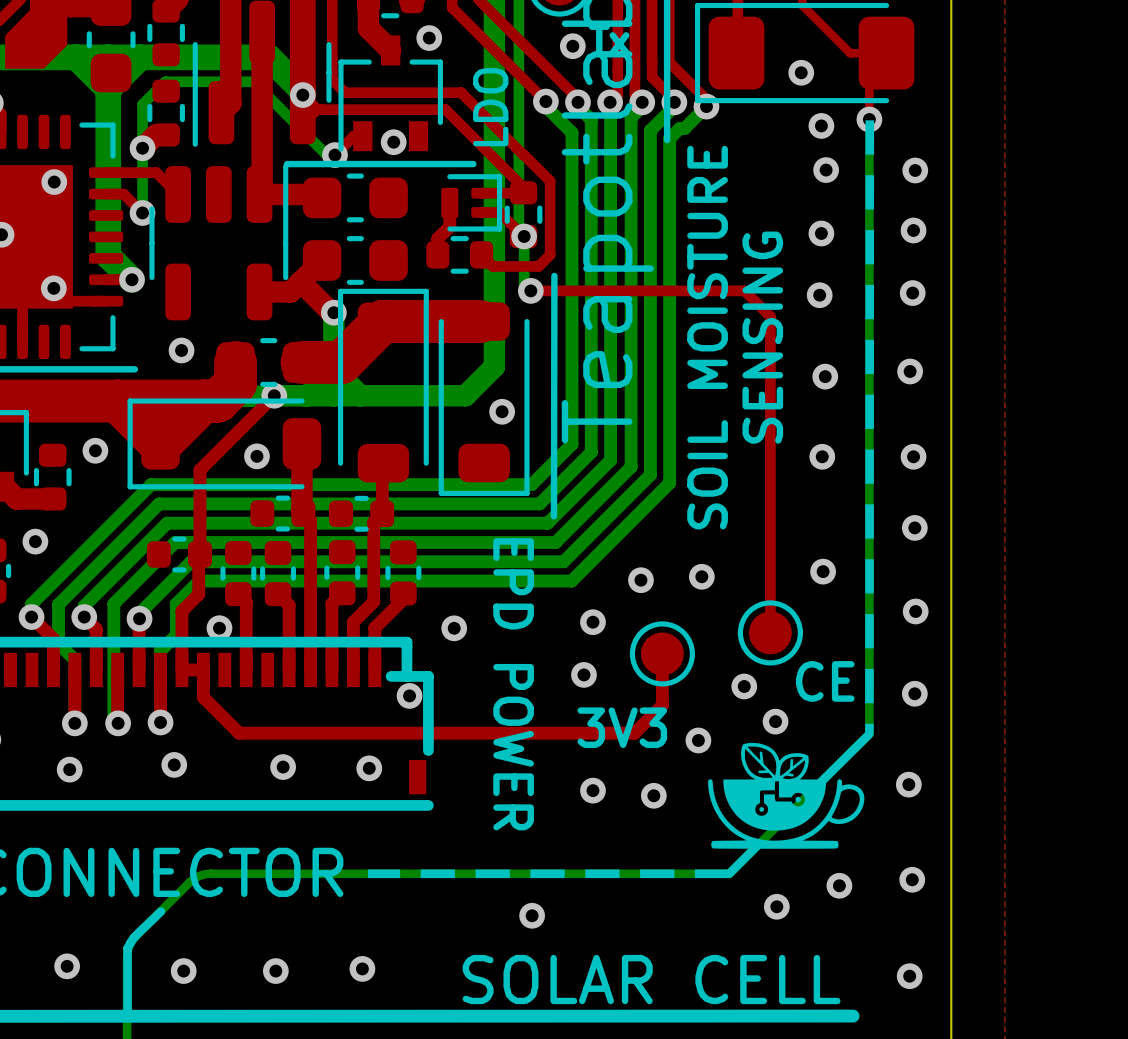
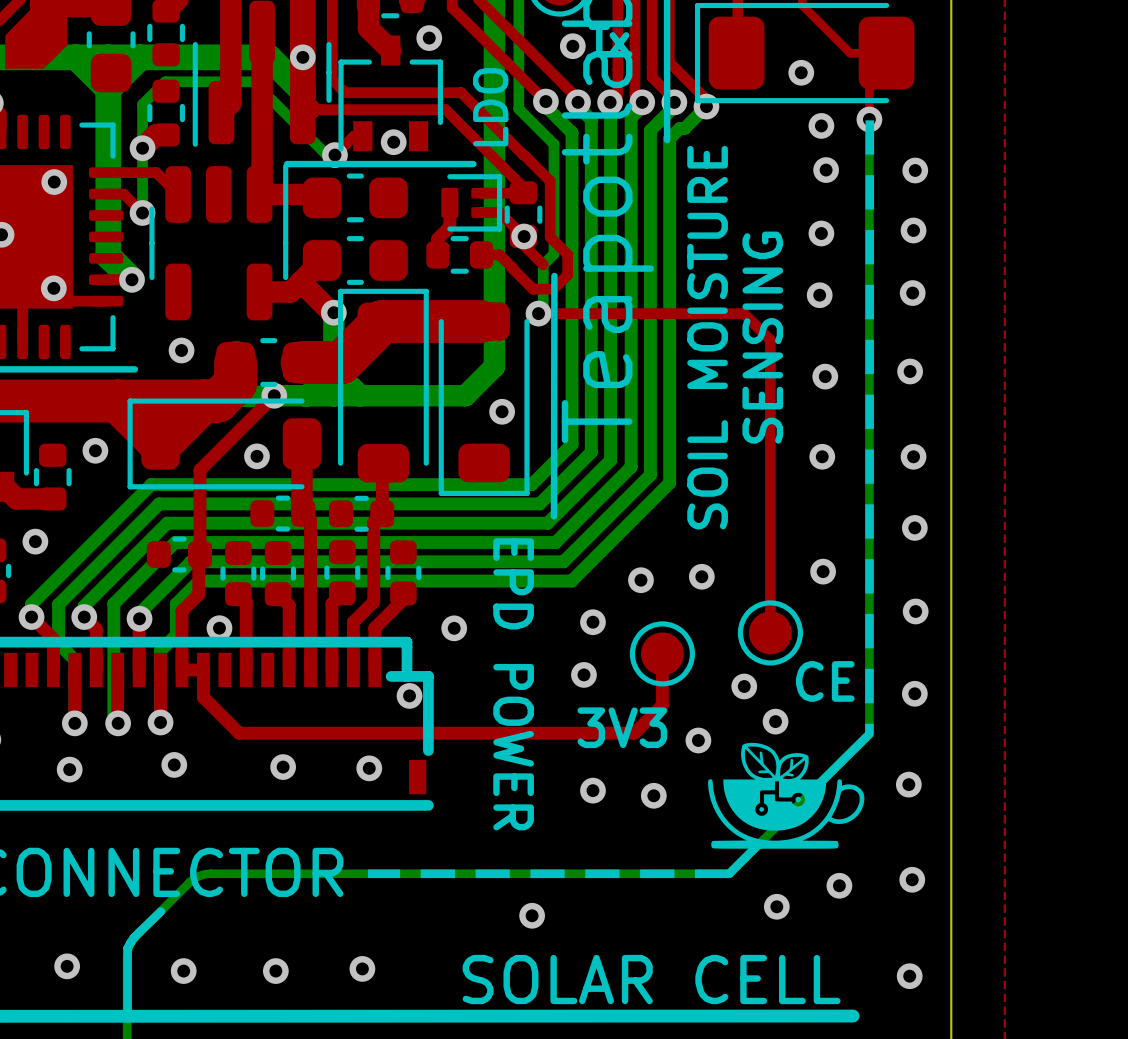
via position: (302, 95) -> (302, 57)
bottom track: (518, 109) (518, 231) (524, 236) (524, 284) (530, 290) -> (518, 109) (554, 144) (554, 254) (543, 264) (543, 308) (538, 313)
top track: none -> (523, 236) (523, 245) (543, 264)
top track: (550, 237) (550, 254) (538, 266) (493, 266) (481, 254) -> (550, 237) (567, 254) (567, 274) (553, 289) (533, 289) (512, 268)
top track: none -> (481, 254) (499, 254) (512, 267)
top track: (530, 290) (744, 290) (770, 316) (770, 340) -> (538, 313) (743, 313) (770, 340)
via position: (530, 290) -> (538, 313)

